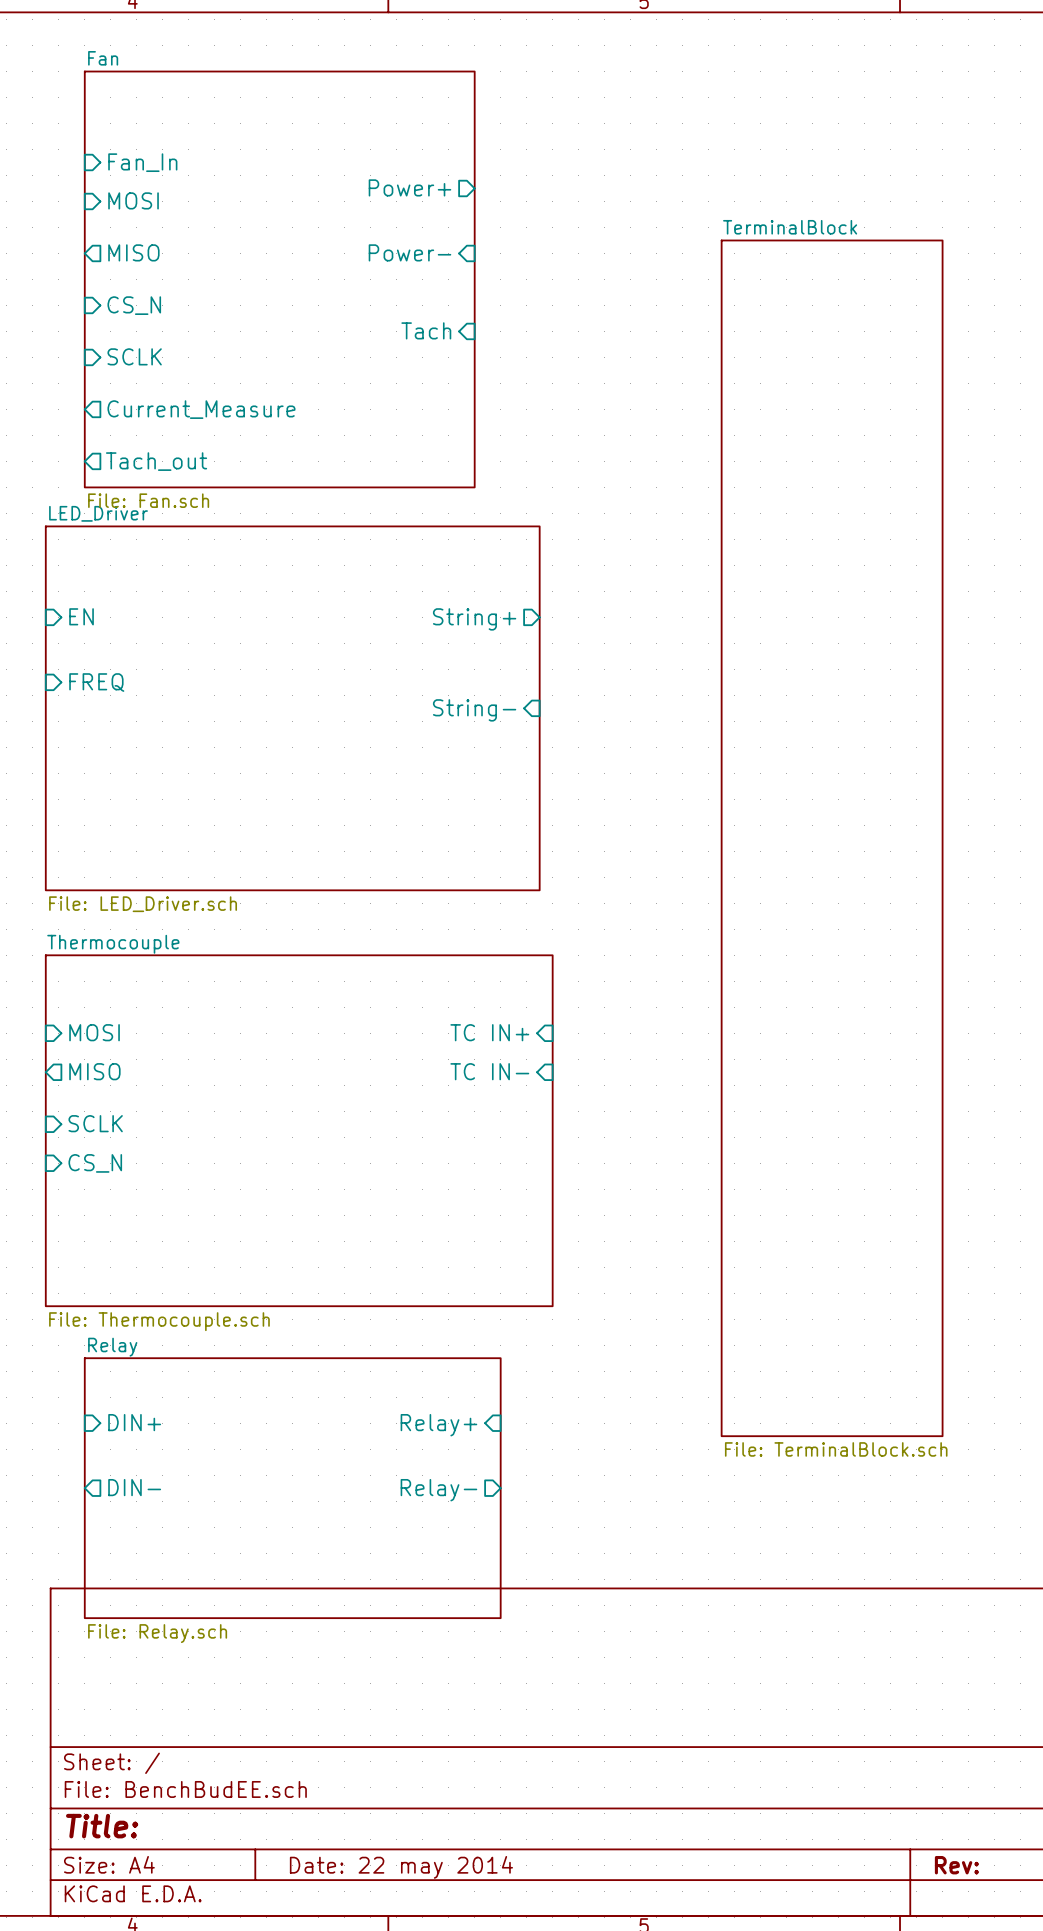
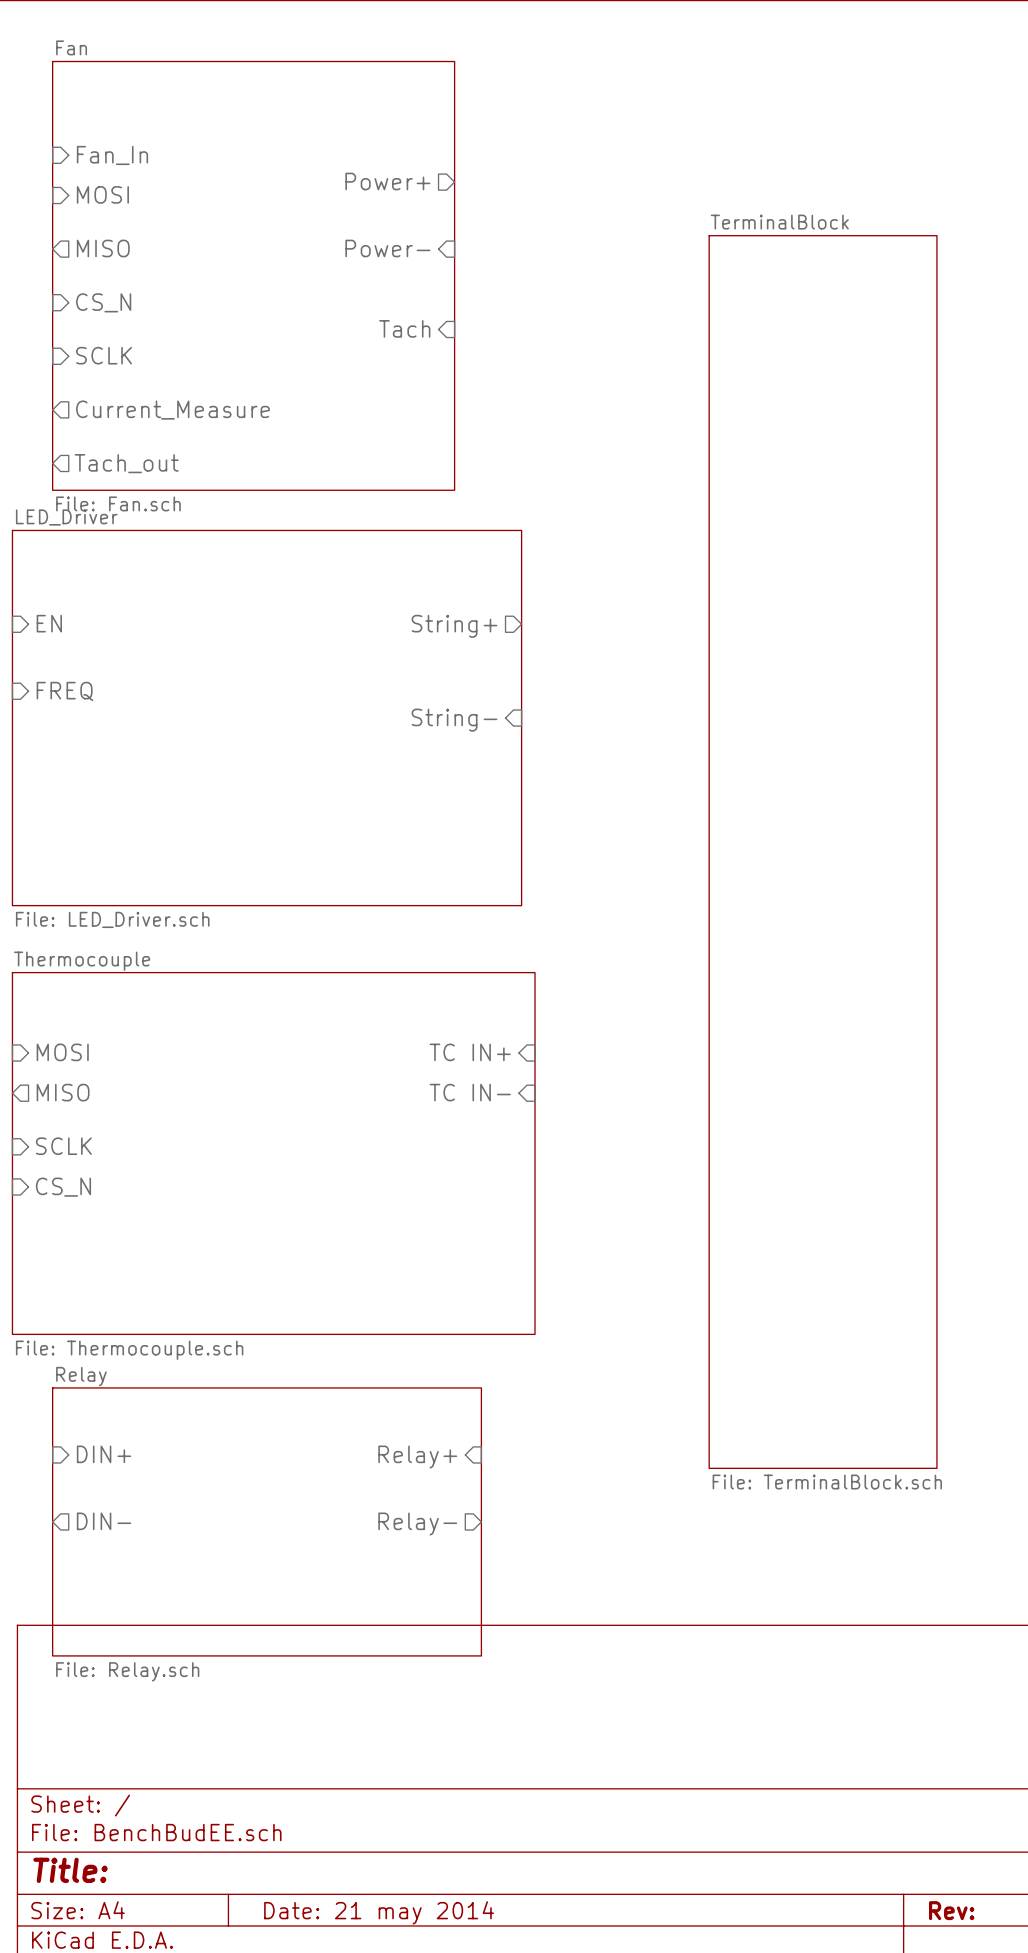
title block: Date: 22 may 2014 (401, 1867) -> Date: 21 may 2014 (379, 1912)

